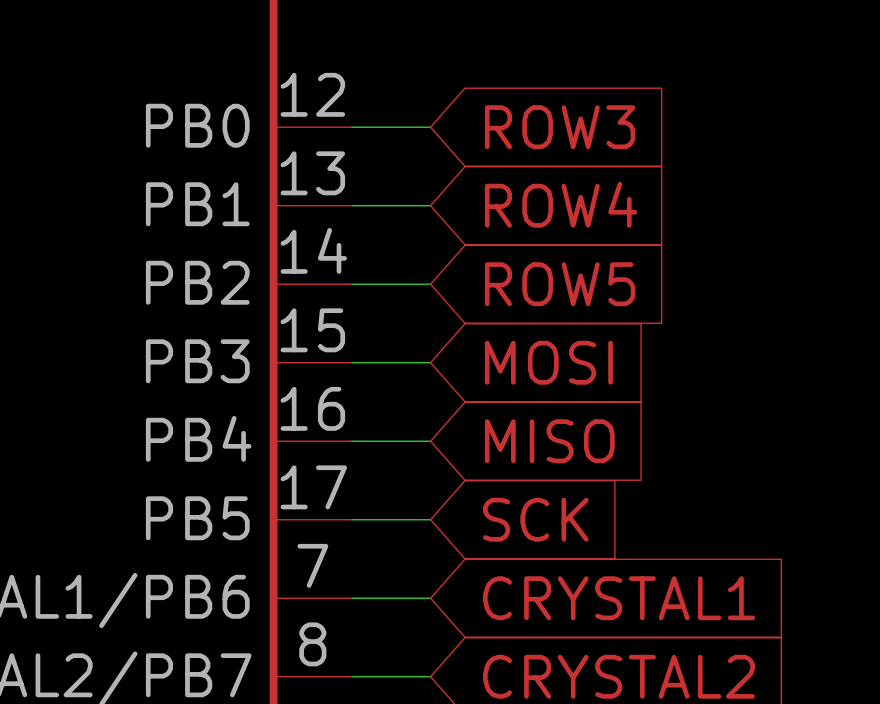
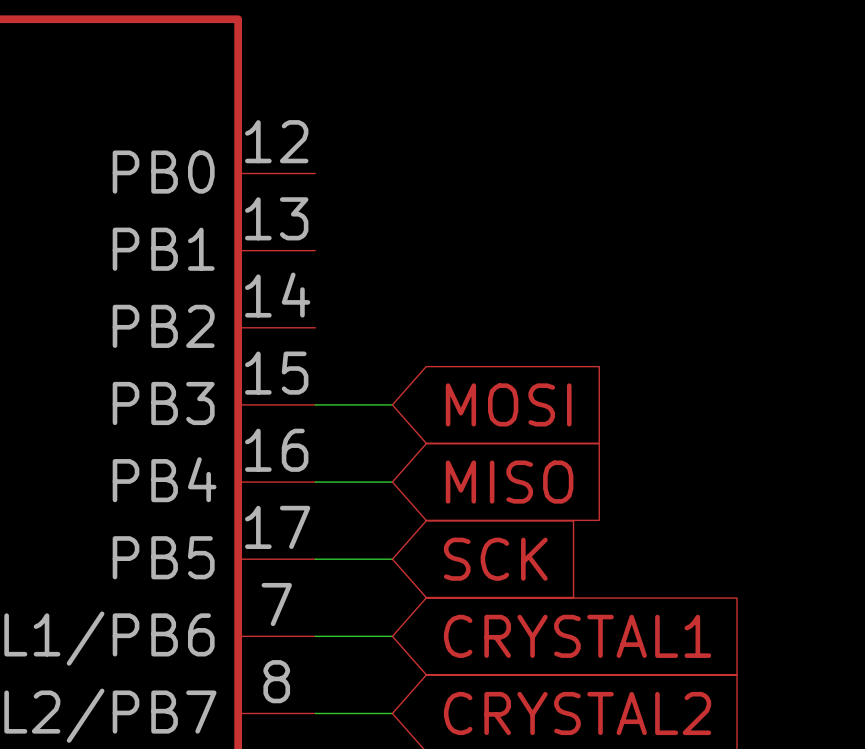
wire: (352, 127) (430, 127) -> none
global label: ROW3 (560, 127) -> none
global label: ROW4 (561, 204) -> none
wire: (352, 205) (430, 205) -> none
wire: (352, 284) (430, 284) -> none
global label: ROW5 (560, 284) -> none

